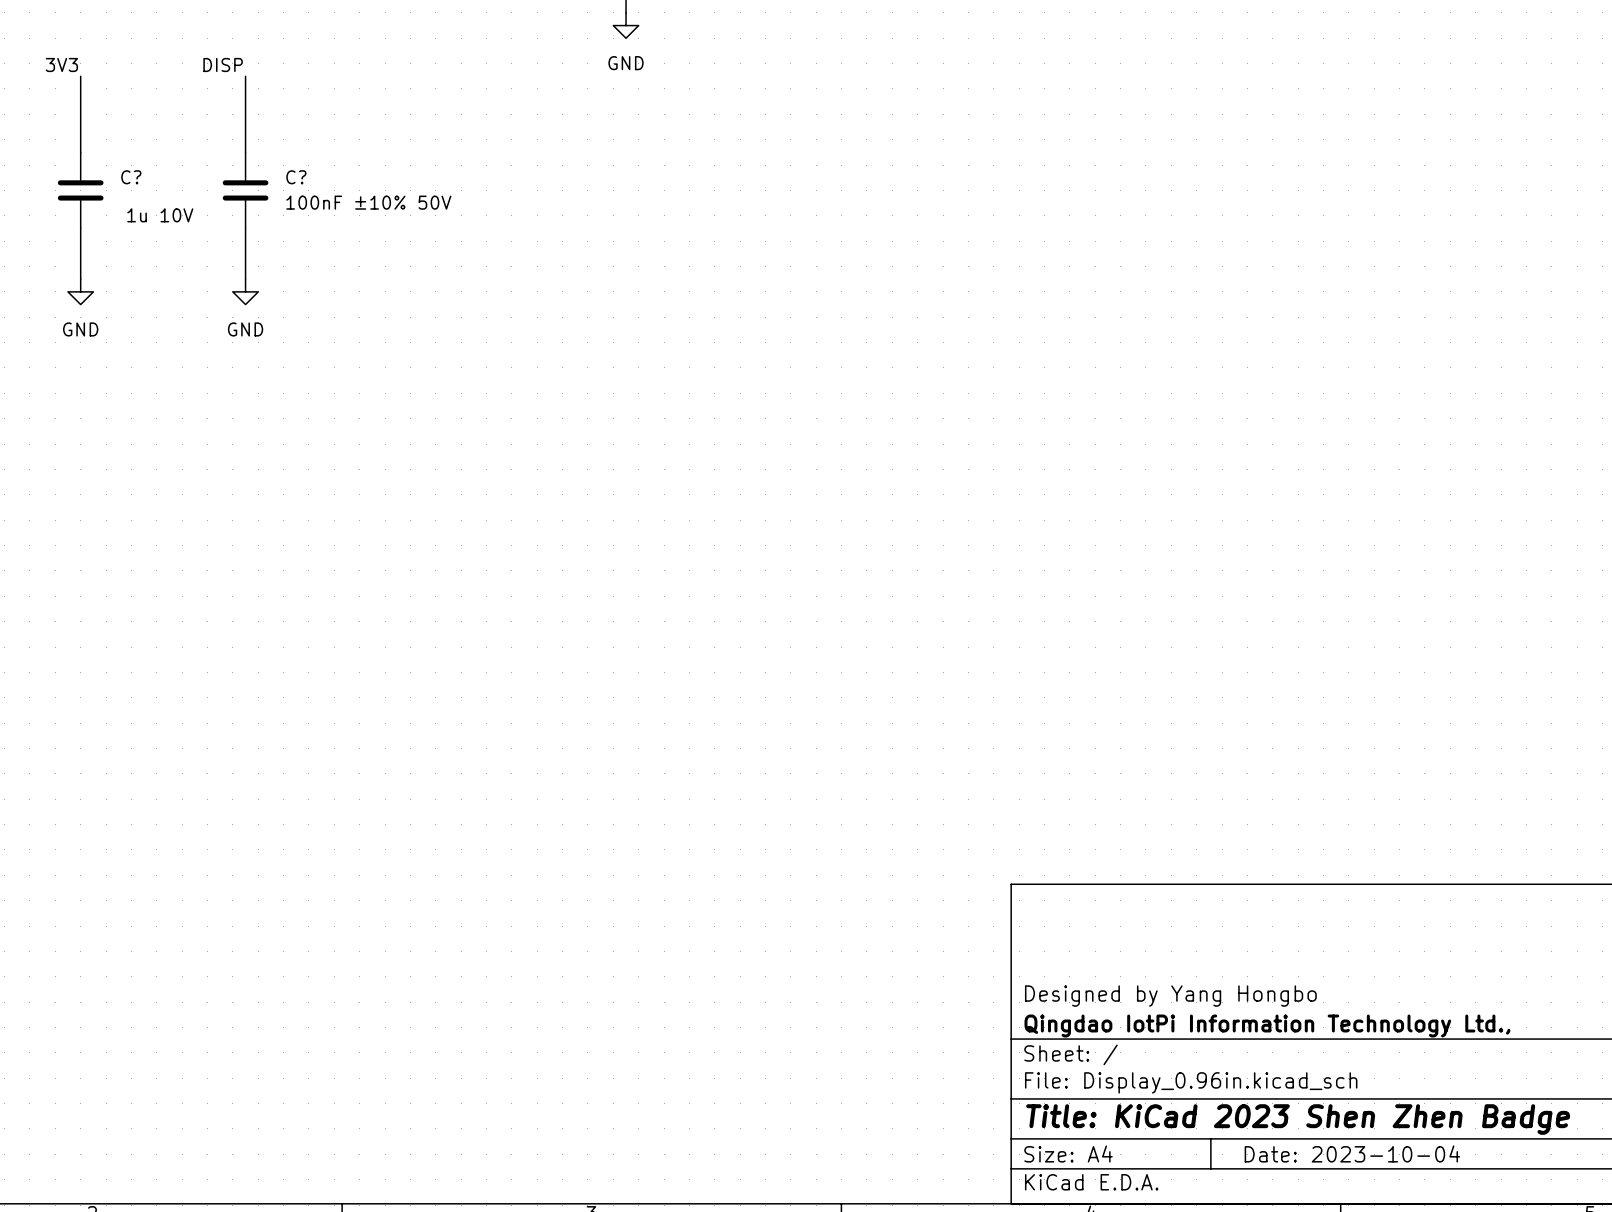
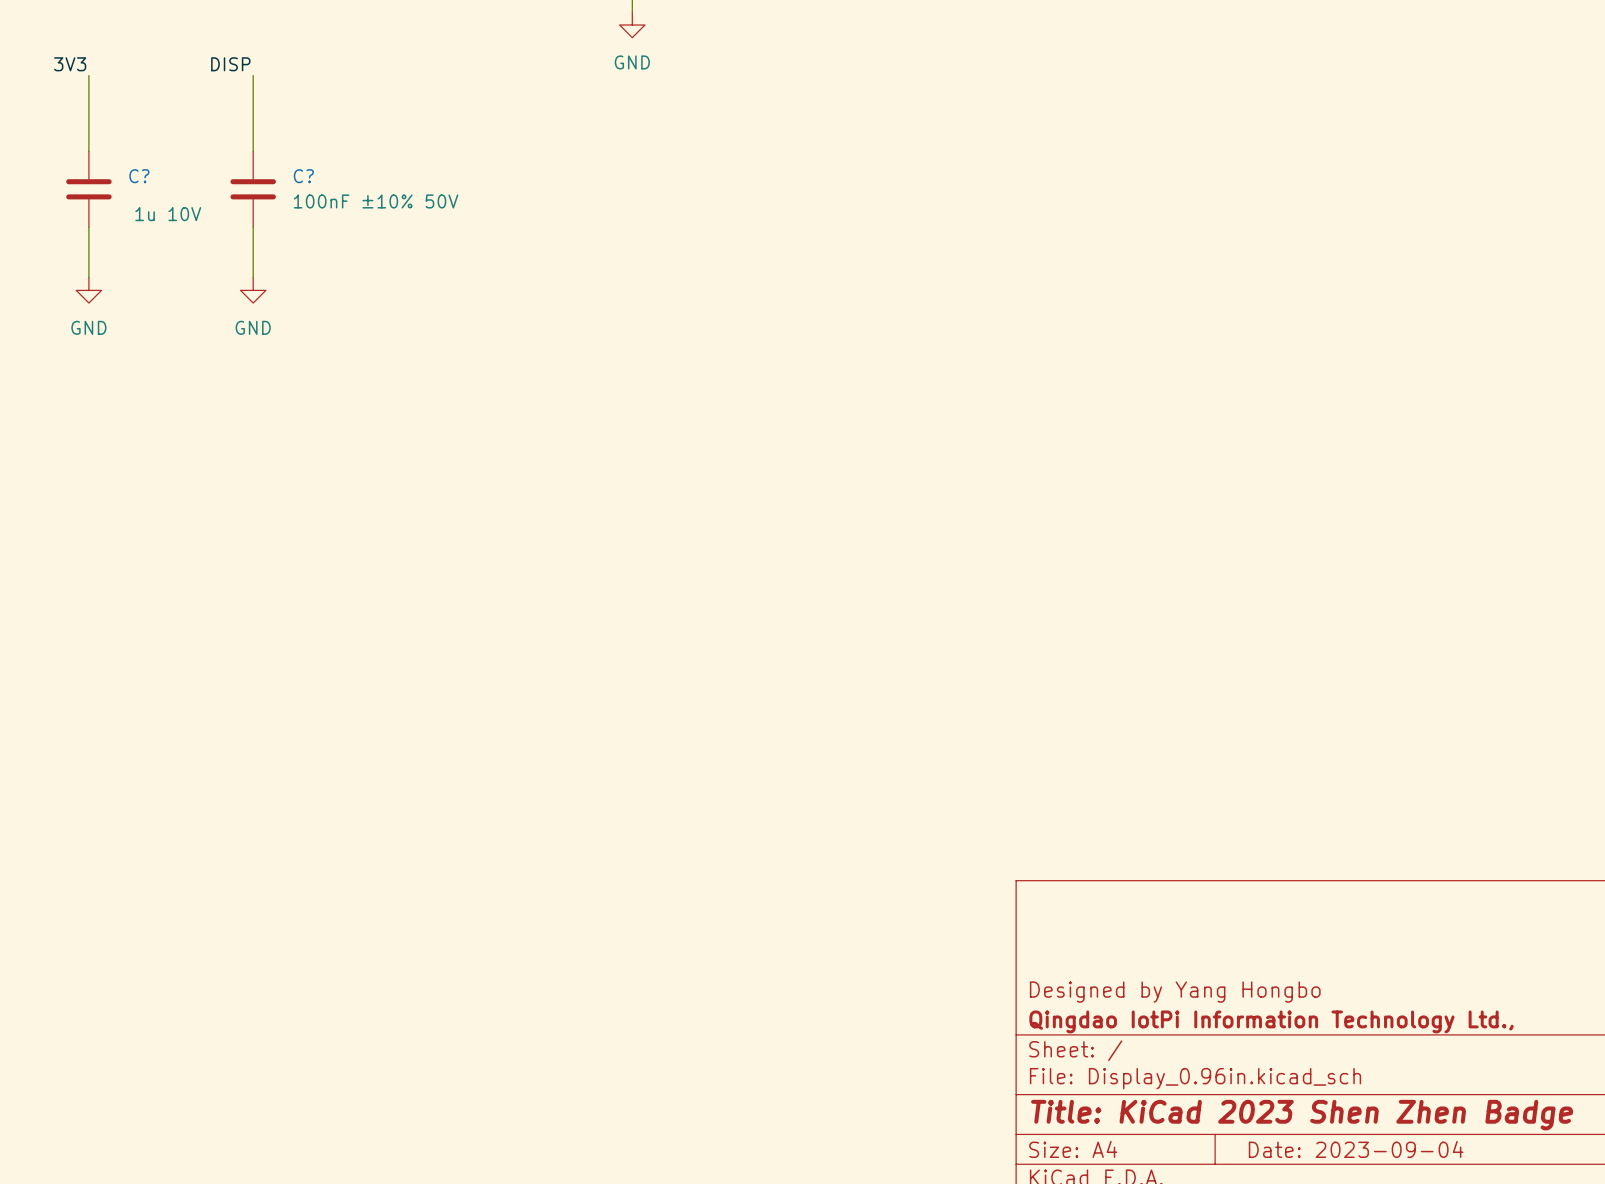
title block: Date: 2023-10-04 (1352, 1153) -> Date: 2023-09-04 (1356, 1149)

